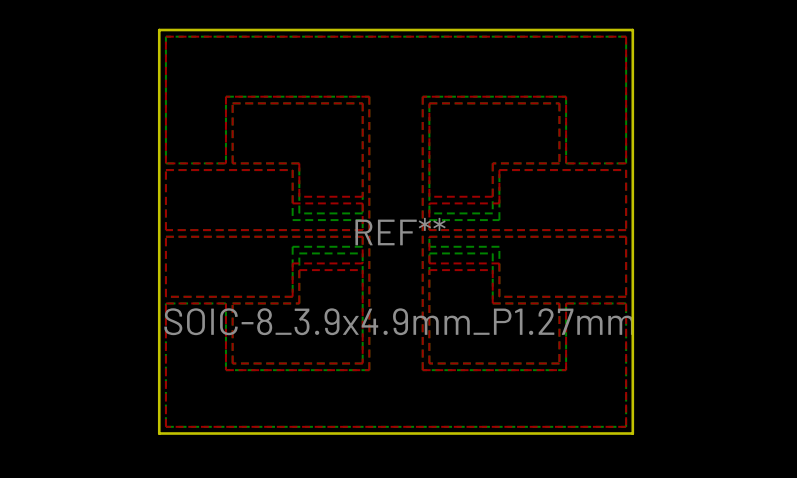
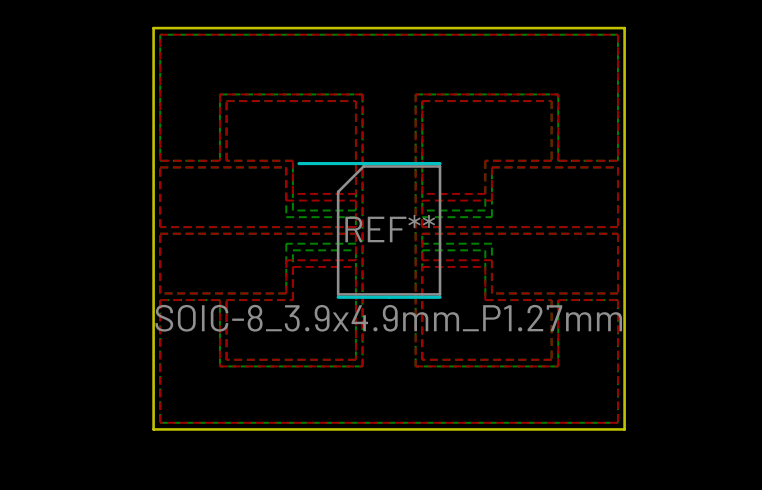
REF**: none -> SOIC-8_3.9x4.9mm_P1.27mm (369, 230)
REF**: SOIC-8_3.9x4.9mm_P1.27mm (398, 276) -> none

